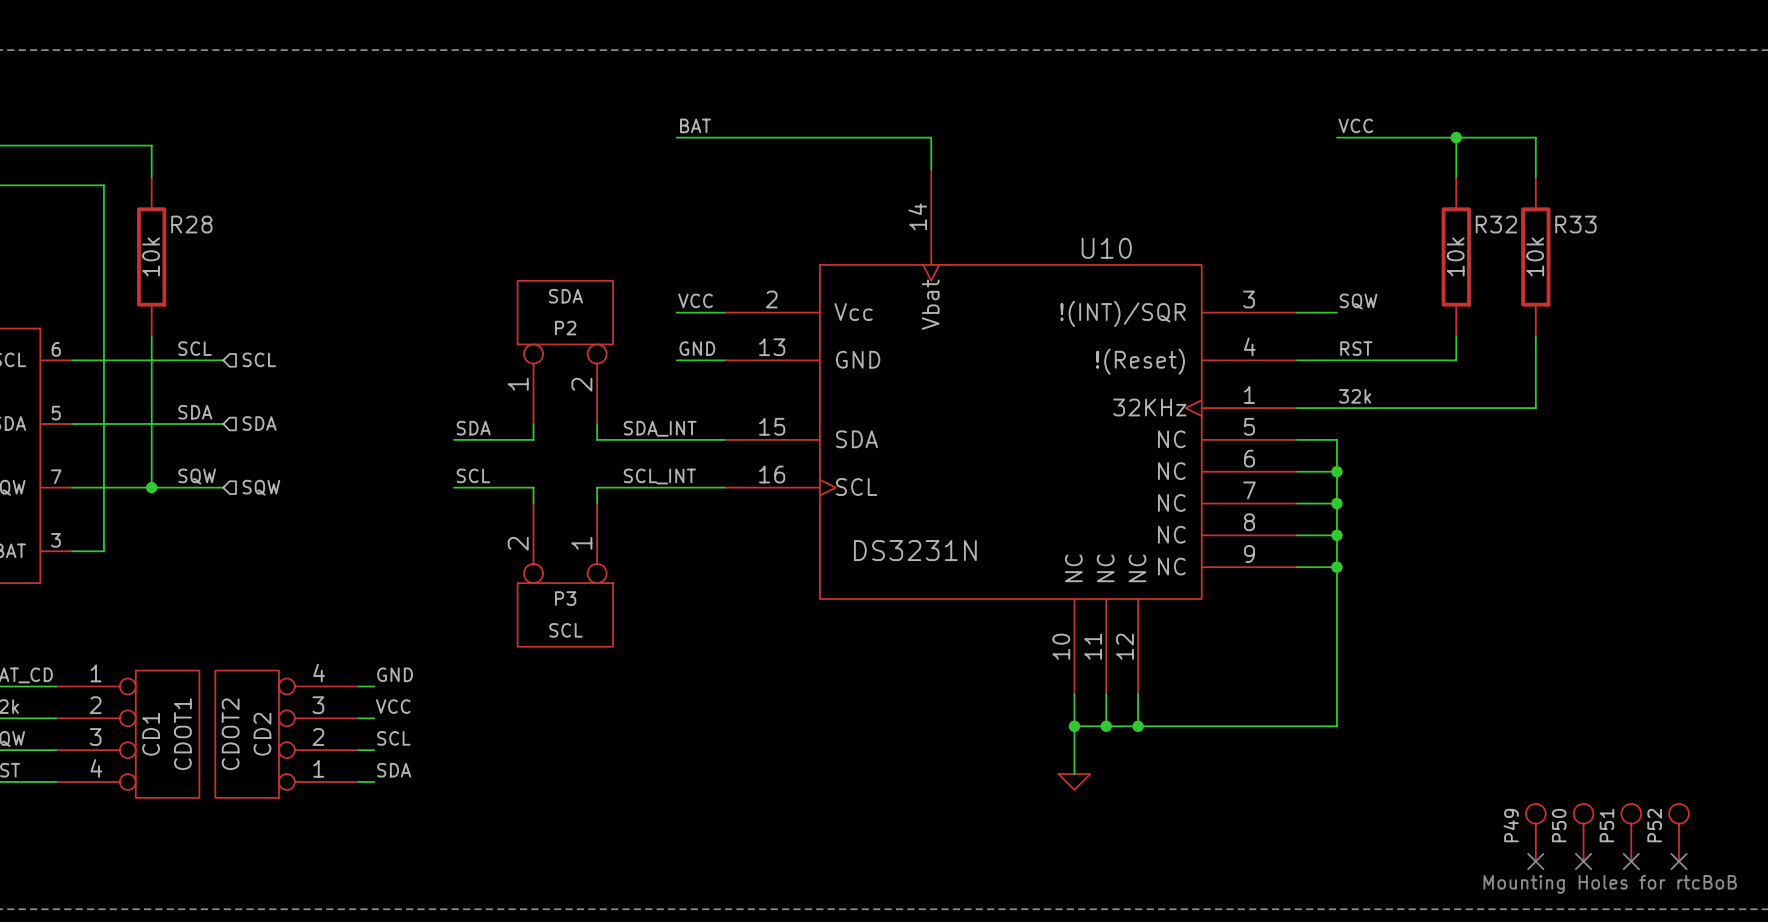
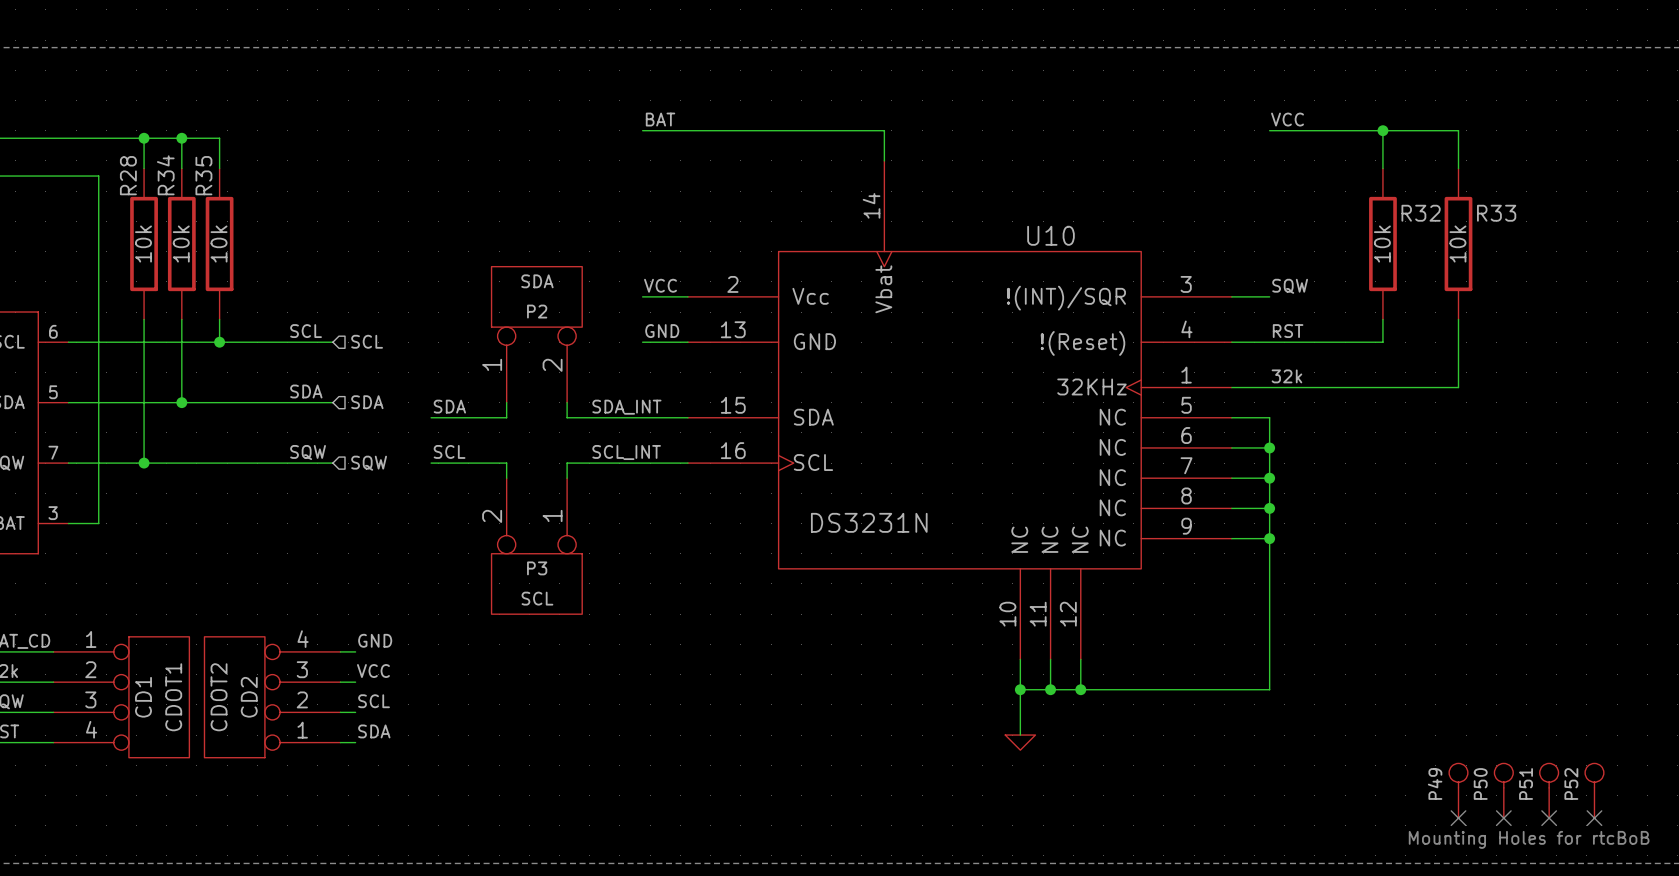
wire: none -> (144, 138) (219, 138) (219, 168)
junction: none -> (144, 138)
wire: none -> (181, 138) (181, 168)
junction: none -> (181, 138)
R28 name rotation: 0° (191, 224) -> 90° counterclockwise (128, 175)
R28 name position: R28 (191, 224) -> R28 (128, 175)
R34: none -> 10k (181, 244)
R35: none -> 10k (219, 244)
wire: none -> (181, 319) (181, 402)
wire: none -> (219, 319) (219, 342)
label position: SCL (194, 348) -> SCL (306, 331)
hierarchical label position: SCL (259, 359) -> SCL (367, 341)
wire: none -> (212, 342) (332, 342)
junction: none -> (219, 342)
label position: SDA (195, 412) -> SDA (306, 391)
hierarchical label position: SDA (259, 423) -> SDA (367, 402)
junction: none -> (181, 402)
wire: none -> (212, 402) (332, 402)
label position: SQW (197, 476) -> SQW (308, 452)
wire: none -> (212, 463) (332, 463)
hierarchical label position: SQW (261, 487) -> SQW (369, 463)

